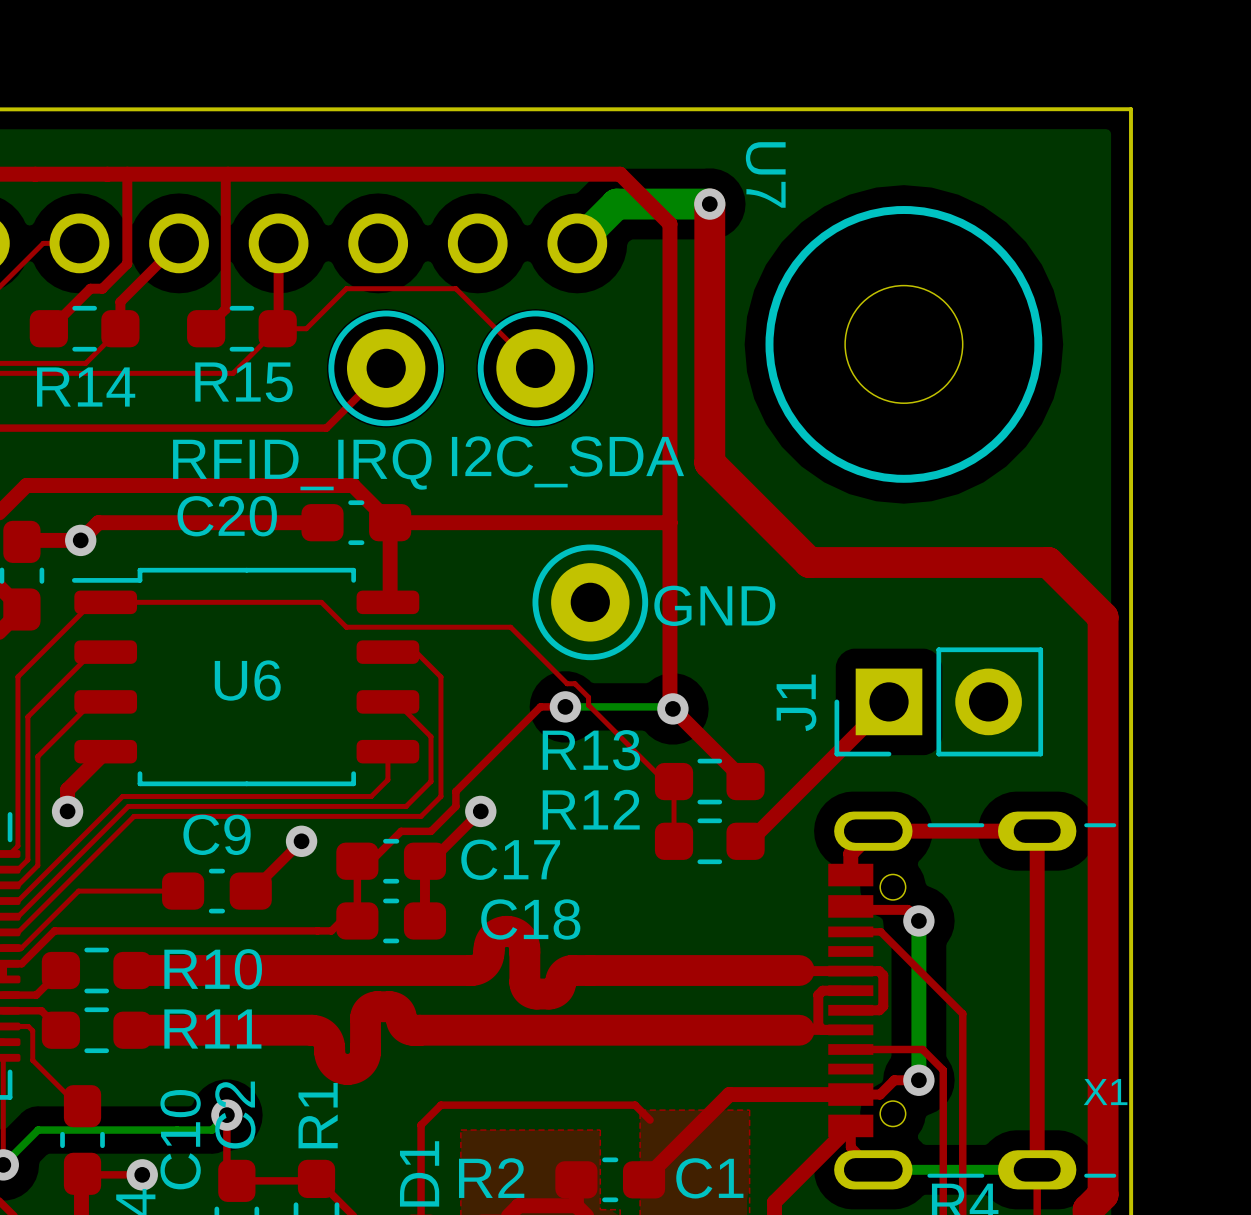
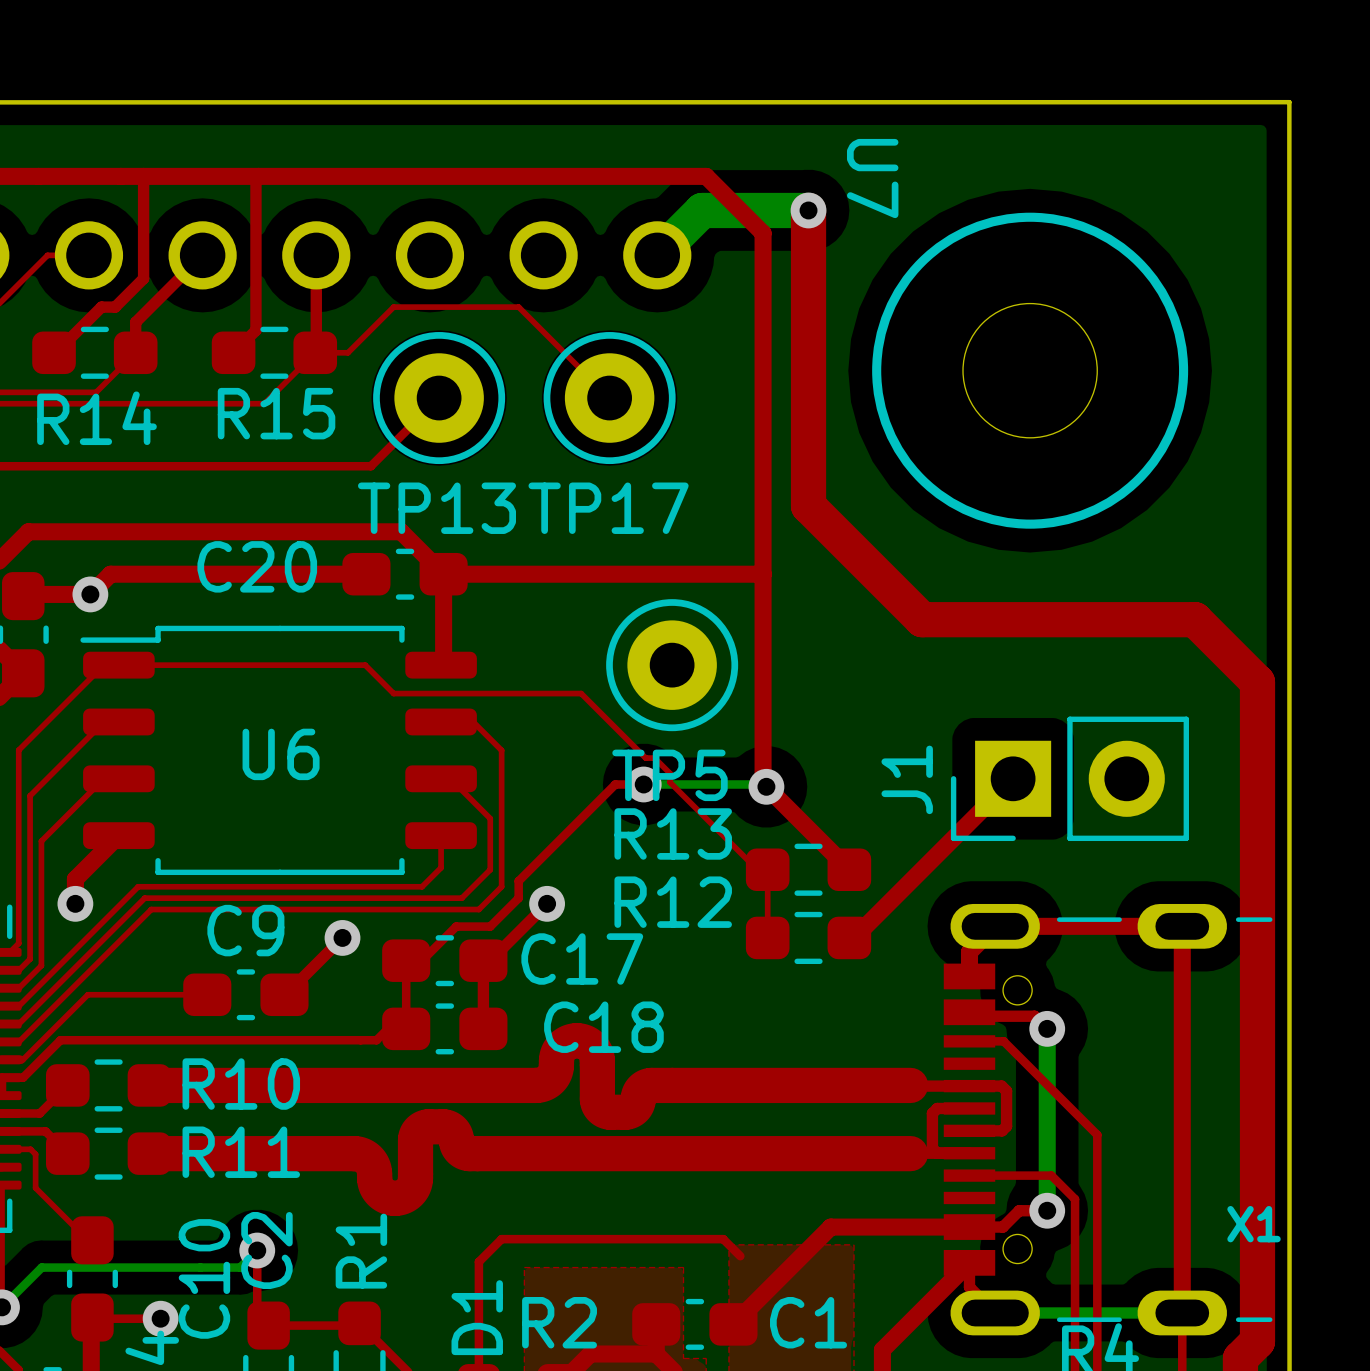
I2C_SDA name: I2C_SDA (567, 461) -> TP17 (608, 508)
RFID_IRQ name: RFID_IRQ (302, 464) -> TP13 (436, 508)
GND name: GND (714, 605) -> TP5 (670, 775)

